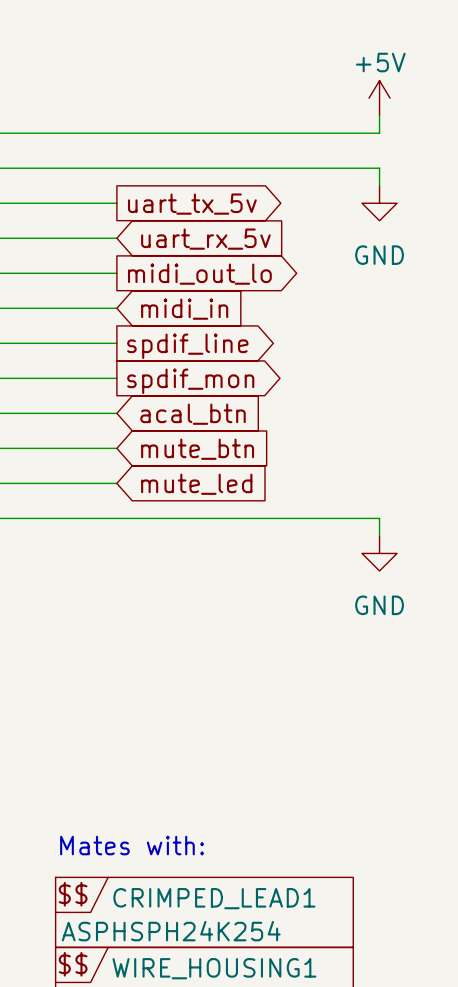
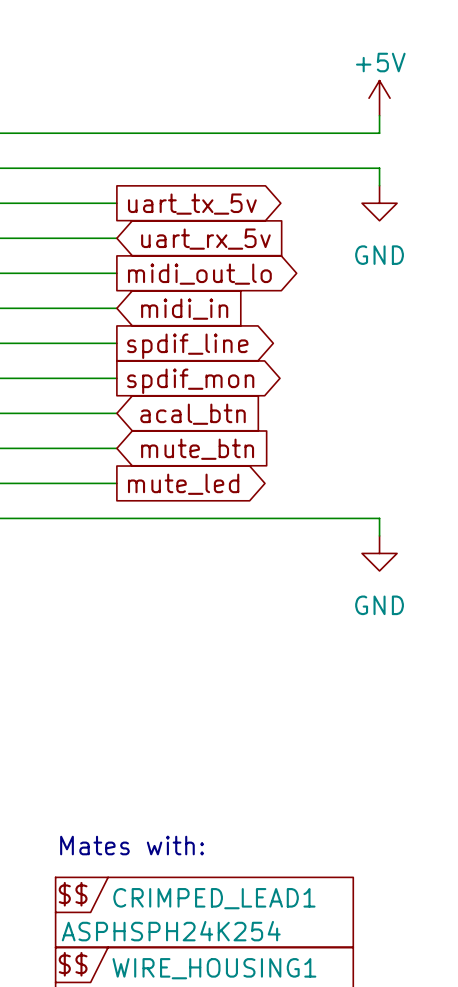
global label shape: input (196, 484) -> output (183, 484)

